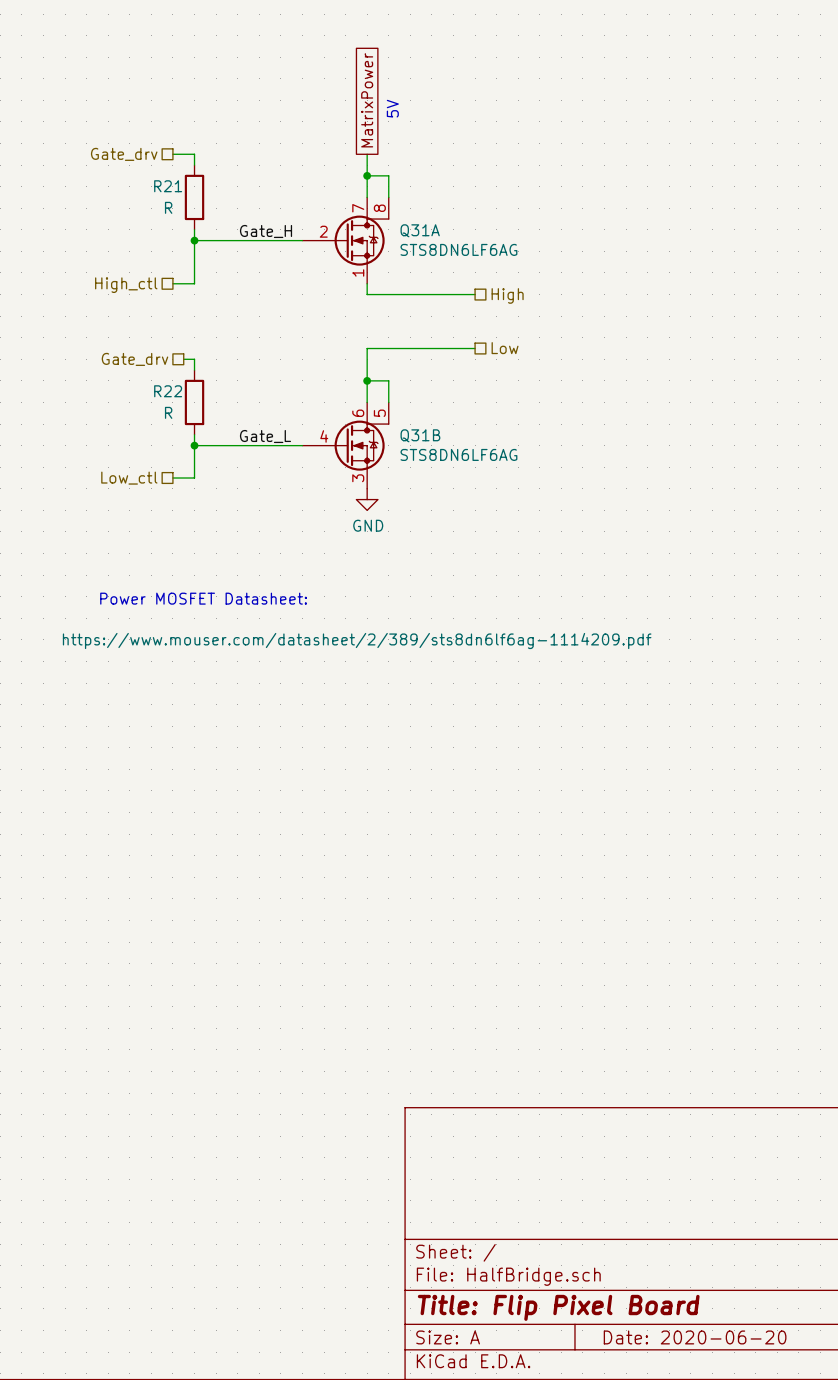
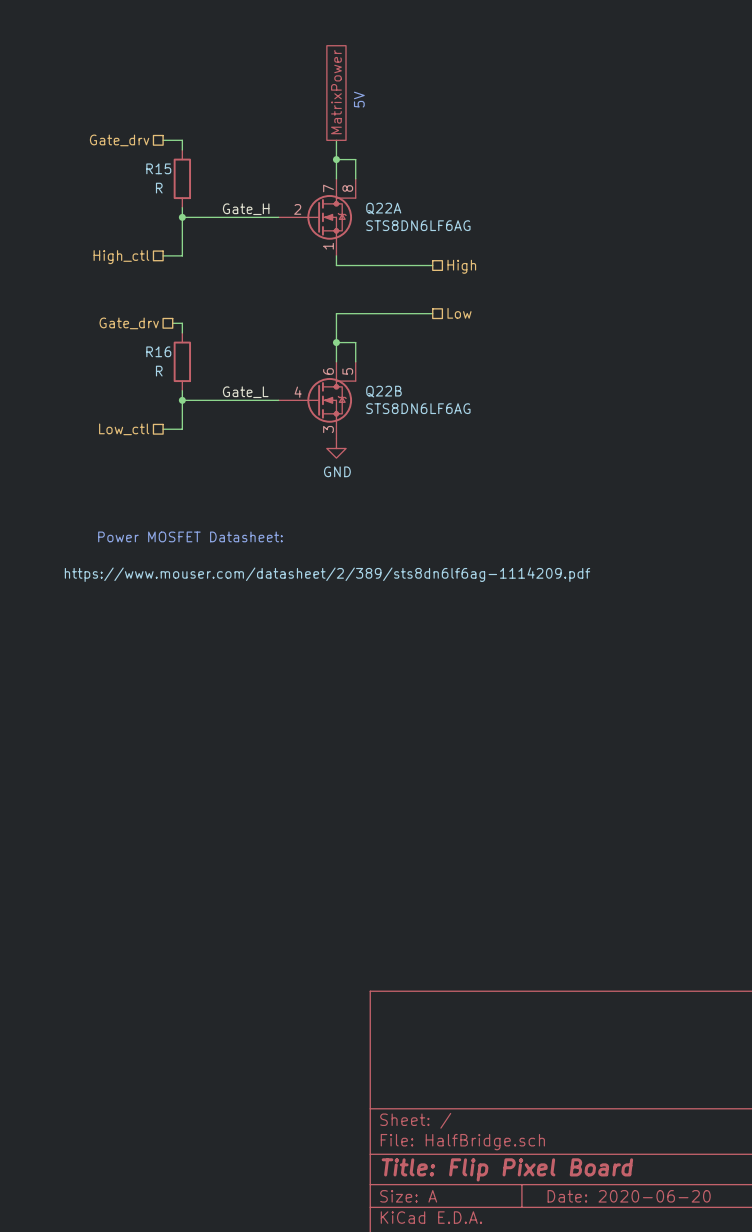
R21 name: R21 (168, 186) -> R15 (158, 168)
Q31A name: Q31A (420, 230) -> Q22A (383, 208)
R22 name: R22 (168, 391) -> R16 (158, 351)
Q31B name: Q31B (420, 435) -> Q22B (383, 391)

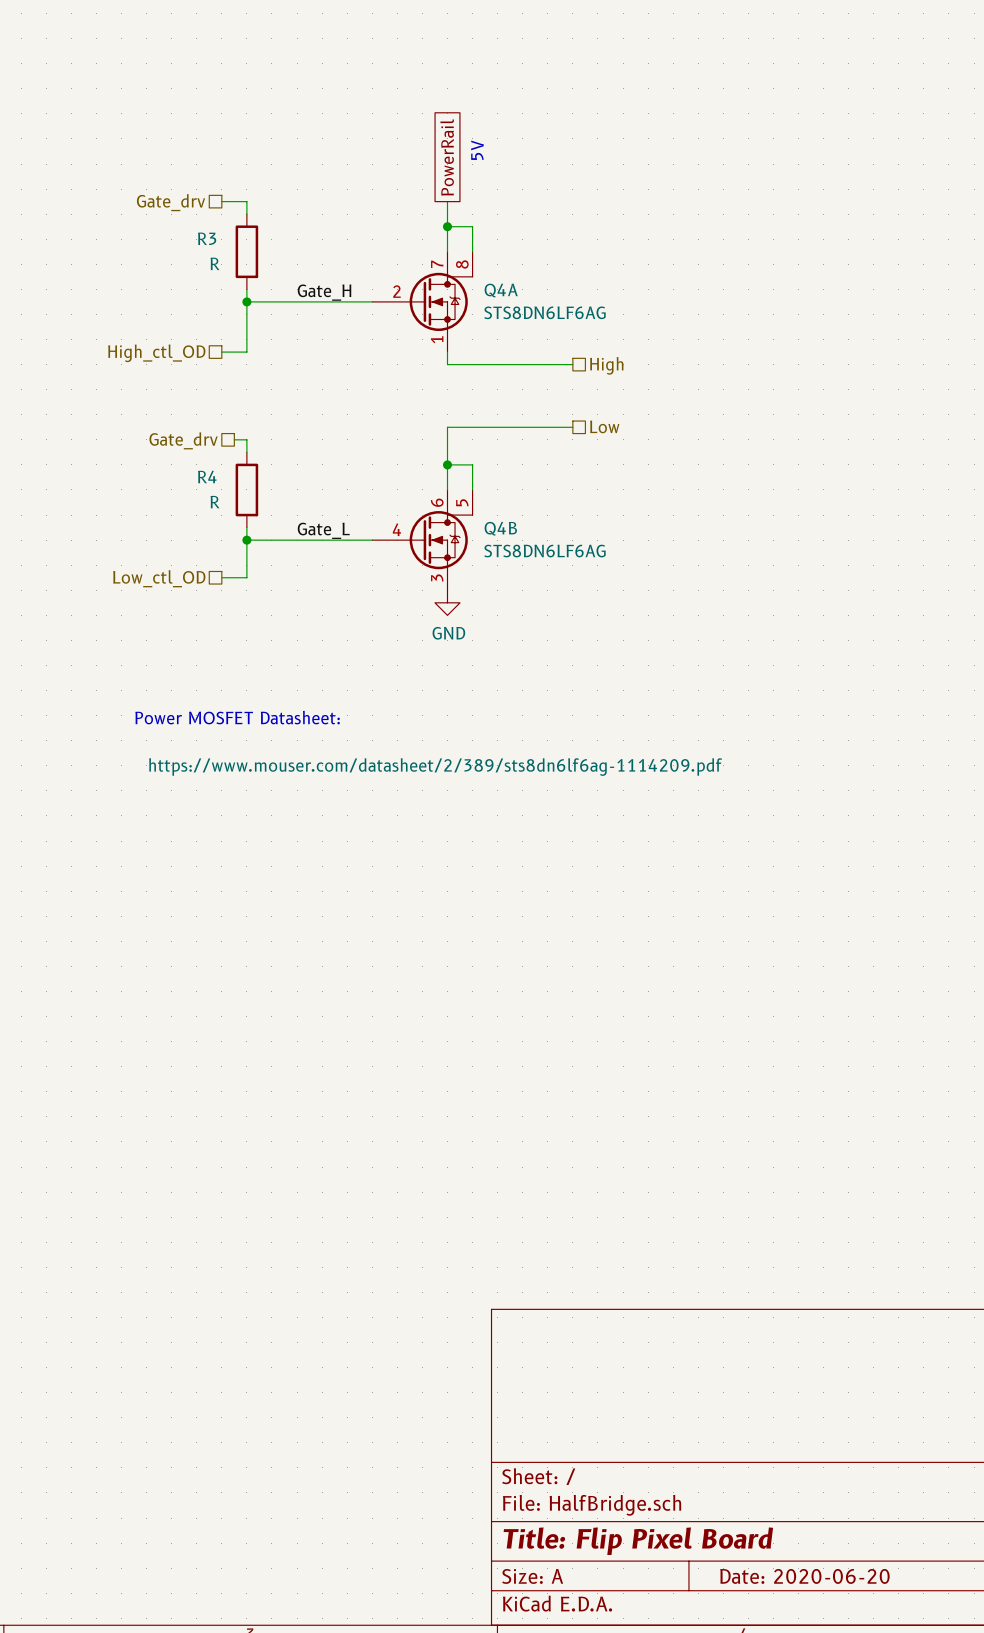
global label: MatrixPower (336, 92) -> PowerRail (447, 157)
R15 name: R15 (158, 168) -> R3 (207, 238)
Q22A name: Q22A (383, 208) -> Q4A (501, 290)
hierarchical label: High_ctl (121, 257) -> High_ctl_OD (156, 353)
R16 name: R16 (158, 351) -> R4 (207, 476)
Q22B name: Q22B (383, 391) -> Q4B (500, 528)
hierarchical label: Low_ctl (124, 429) -> Low_ctl_OD (159, 578)

